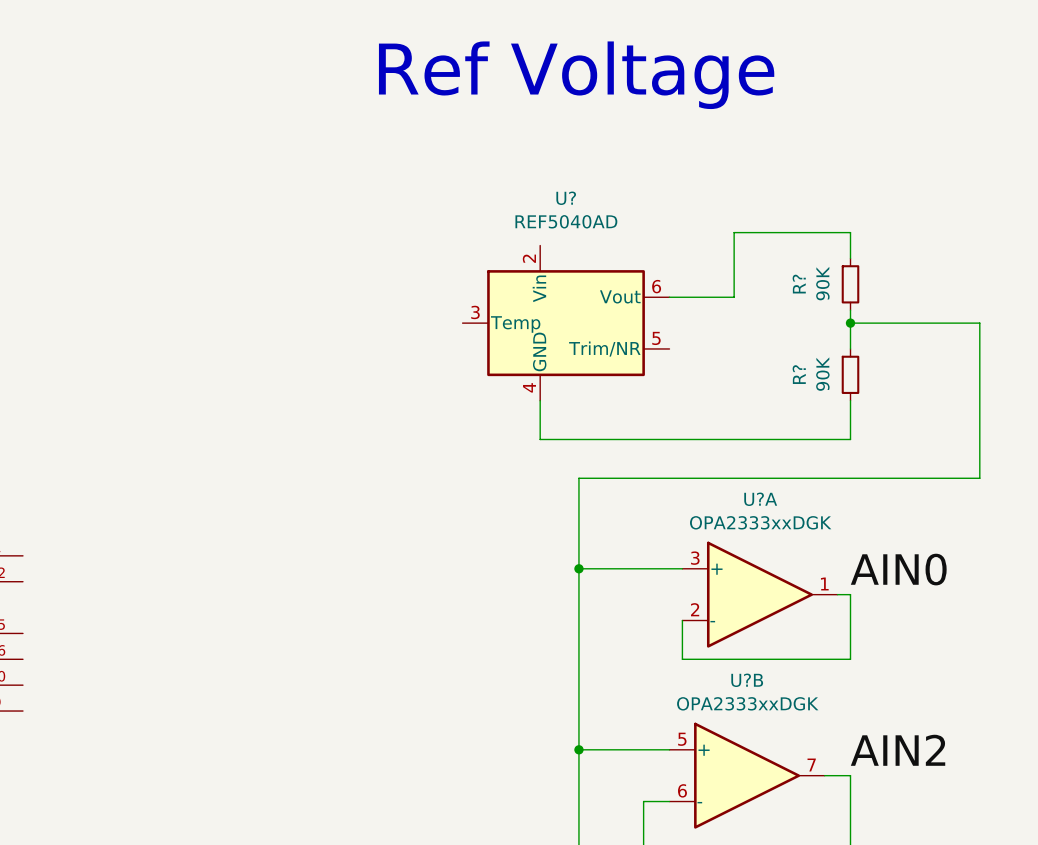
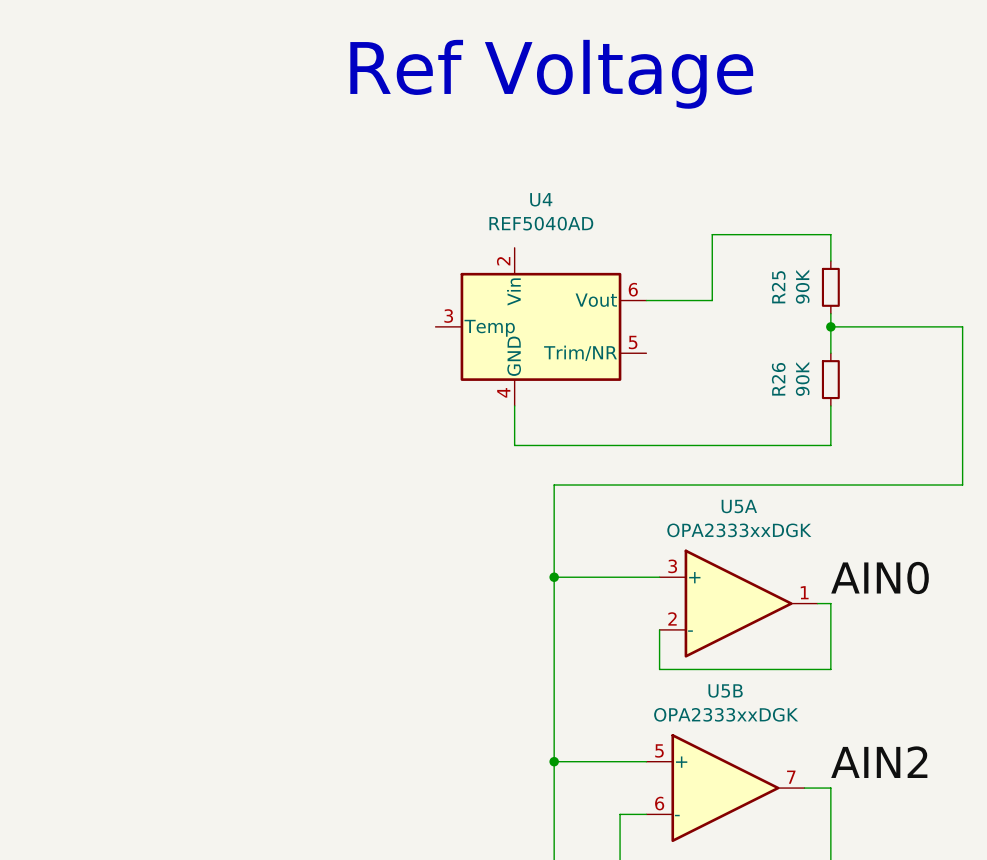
U? name: U? (566, 198) -> U4 (541, 199)
R? name: R? (799, 284) -> R25 (778, 287)
R? name: R? (799, 374) -> R26 (778, 379)
U?A name: U?A (760, 499) -> U5A (739, 506)
U?B name: U?B (747, 680) -> U5B (725, 690)

